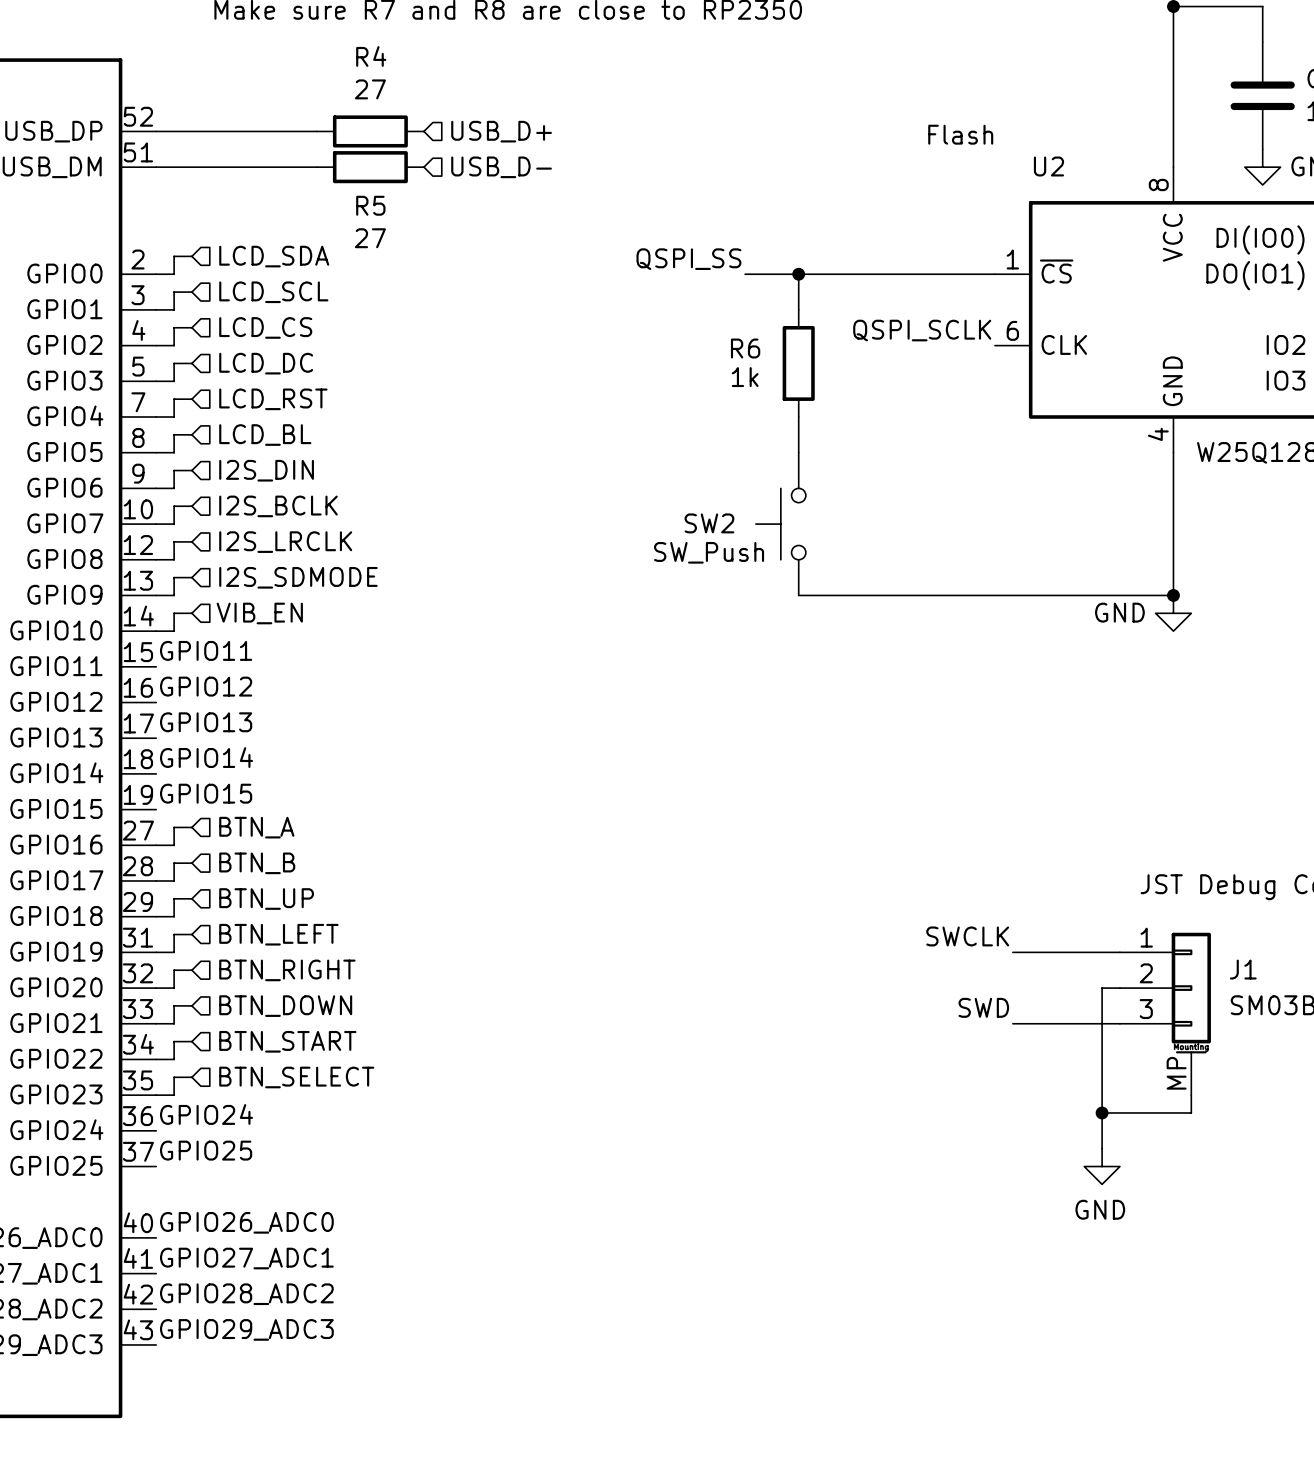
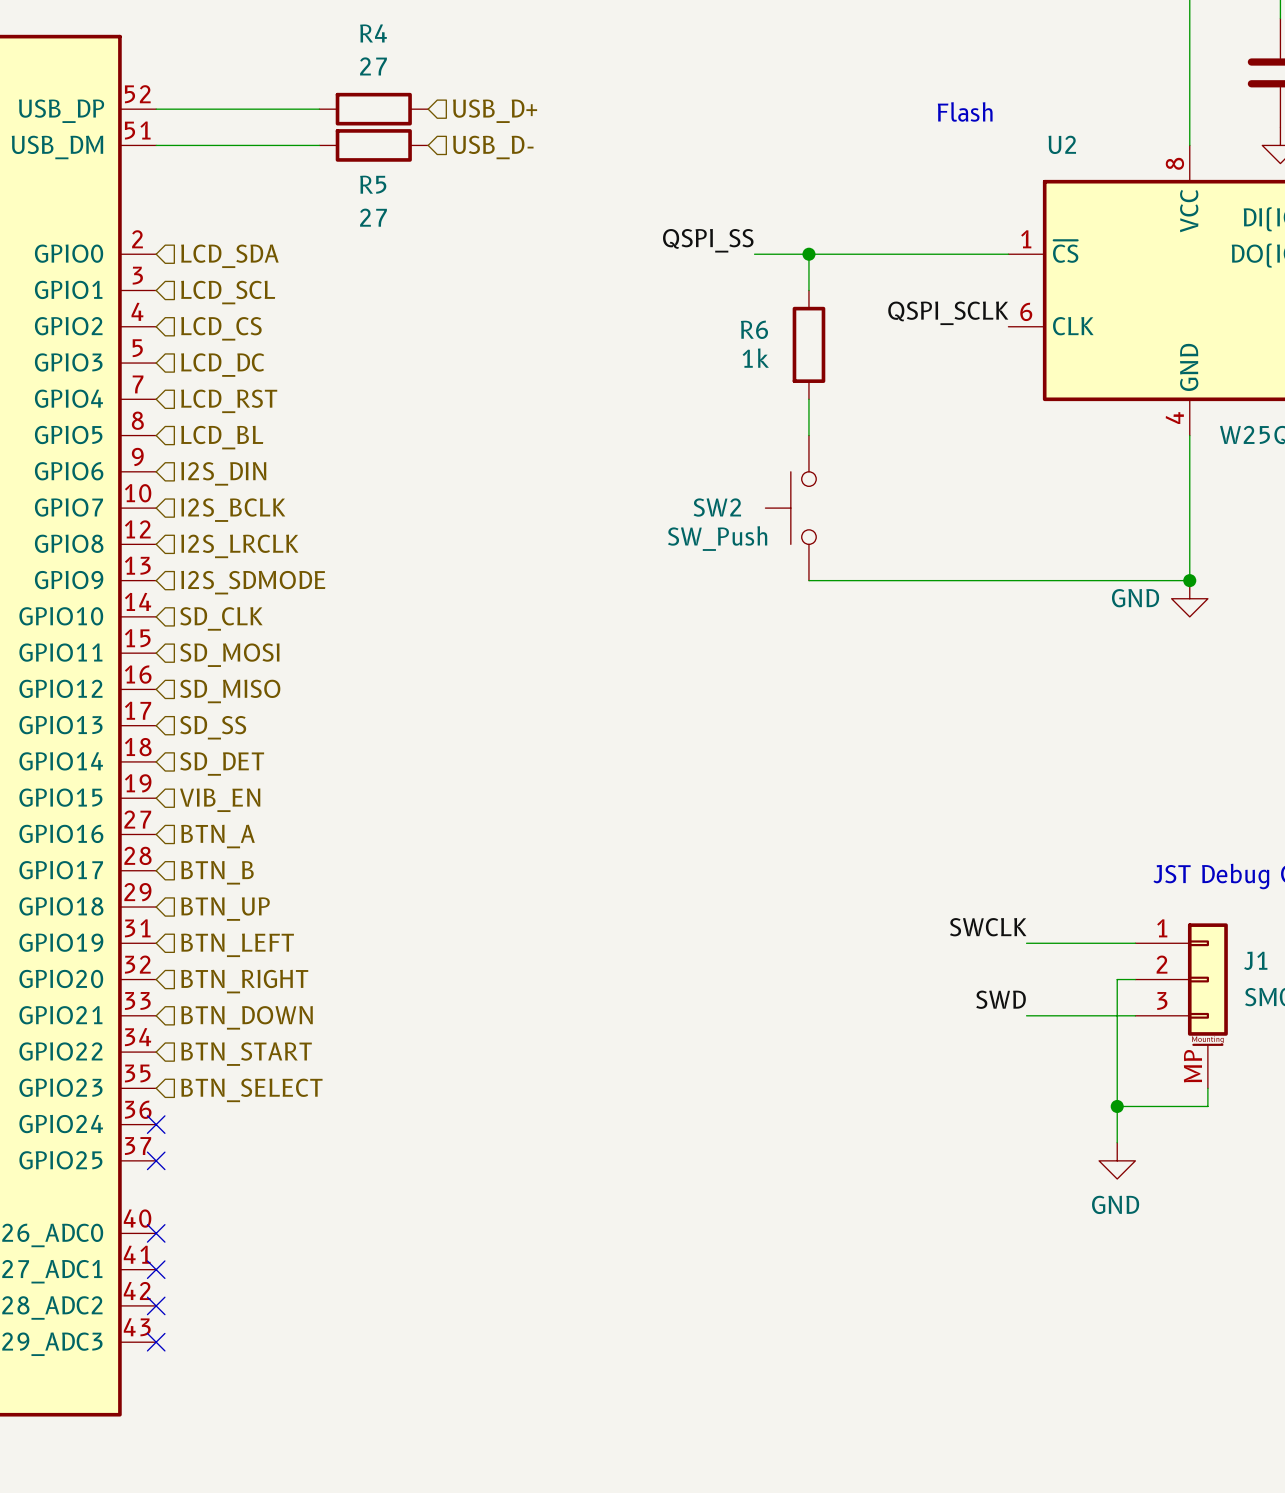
wire: (191, 256) (174, 256) (174, 274) (156, 274) -> none
hierarchical label position: LCD_SDA (274, 256) -> LCD_SDA (229, 256)
wire: (191, 292) (174, 292) (174, 309) (156, 309) -> none
hierarchical label position: LCD_SCL (273, 292) -> LCD_SCL (228, 292)
wire: (191, 327) (174, 327) (174, 345) (156, 345) -> none
hierarchical label position: LCD_CS (265, 327) -> LCD_CS (221, 328)
wire: (191, 363) (174, 363) (174, 381) (156, 381) -> none
hierarchical label position: LCD_DC (266, 363) -> LCD_DC (222, 365)
wire: (191, 399) (174, 399) (174, 417) (156, 417) -> none
hierarchical label position: LCD_RST (273, 399) -> LCD_RST (229, 401)
wire: (191, 434) (174, 434) (174, 452) (156, 452) -> none
hierarchical label position: LCD_BL (265, 435) -> LCD_BL (222, 437)
wire: (191, 470) (174, 470) (174, 488) (156, 488) -> none
hierarchical label position: I2S_DIN (266, 470) -> I2S_DIN (223, 473)
wire: (191, 506) (174, 506) (174, 524) (156, 524) -> none
hierarchical label position: I2S_BCLK (278, 506) -> I2S_BCLK (233, 510)
wire: (191, 541) (174, 541) (174, 559) (156, 559) -> none
hierarchical label position: I2S_LRCLK (285, 542) -> I2S_LRCLK (239, 546)
wire: (191, 577) (174, 577) (174, 595) (156, 595) -> none
hierarchical label position: I2S_SDMODE (298, 577) -> I2S_SDMODE (253, 582)
wire: (191, 613) (174, 613) (174, 631) (156, 631) -> none
hierarchical label position: VIB_EN (259, 613) -> VIB_EN (220, 800)
hierarchical label: none -> SD_CLK (221, 618)
label: GPIO11 (206, 650) -> none
hierarchical label: none -> SD_MOSI (229, 655)
label: GPIO12 (206, 686) -> none
hierarchical label: none -> SD_MISO (230, 691)
label: GPIO13 (206, 722) -> none
hierarchical label: none -> SD_SS (213, 727)
label: GPIO14 (206, 757) -> none
hierarchical label: none -> SD_DET (222, 764)
label: GPIO15 (206, 793) -> none
wire: (191, 827) (174, 827) (174, 845) (156, 845) -> none
hierarchical label position: BTN_A (256, 827) -> BTN_A (217, 836)
wire: (191, 863) (174, 863) (174, 880) (156, 880) -> none
hierarchical label position: BTN_B (257, 863) -> BTN_B (217, 872)
wire: (191, 898) (174, 898) (174, 916) (156, 916) -> none
hierarchical label position: BTN_UP (266, 899) -> BTN_UP (225, 909)
wire: (191, 934) (174, 934) (174, 952) (156, 952) -> none
hierarchical label position: BTN_LEFT (278, 934) -> BTN_LEFT (237, 945)
wire: (191, 970) (174, 970) (174, 988) (156, 988) -> none
hierarchical label position: BTN_RIGHT (287, 970) -> BTN_RIGHT (244, 981)
wire: (191, 1005) (174, 1005) (174, 1023) (156, 1023) -> none
hierarchical label position: BTN_DOWN (285, 1006) -> BTN_DOWN (246, 1017)
wire: (191, 1041) (174, 1041) (174, 1059) (156, 1059) -> none
hierarchical label position: BTN_START (287, 1041) -> BTN_START (246, 1054)
wire: (191, 1077) (174, 1077) (174, 1095) (156, 1095) -> none
hierarchical label position: BTN_SELECT (296, 1077) -> BTN_SELECT (251, 1090)
label: GPIO24 (206, 1114) -> none
no-connect mark: none -> (156, 1124)
label: GPIO25 (206, 1150) -> none
no-connect mark: none -> (156, 1160)
label: GPIO26_ADC0 (246, 1222) -> none
no-connect mark: none -> (156, 1233)
label: GPIO27_ADC1 (246, 1258) -> none
no-connect mark: none -> (156, 1269)
label: GPIO28_ADC2 (246, 1294) -> none
no-connect mark: none -> (156, 1305)
label: GPIO29_ADC3 (246, 1329) -> none
no-connect mark: none -> (156, 1342)

